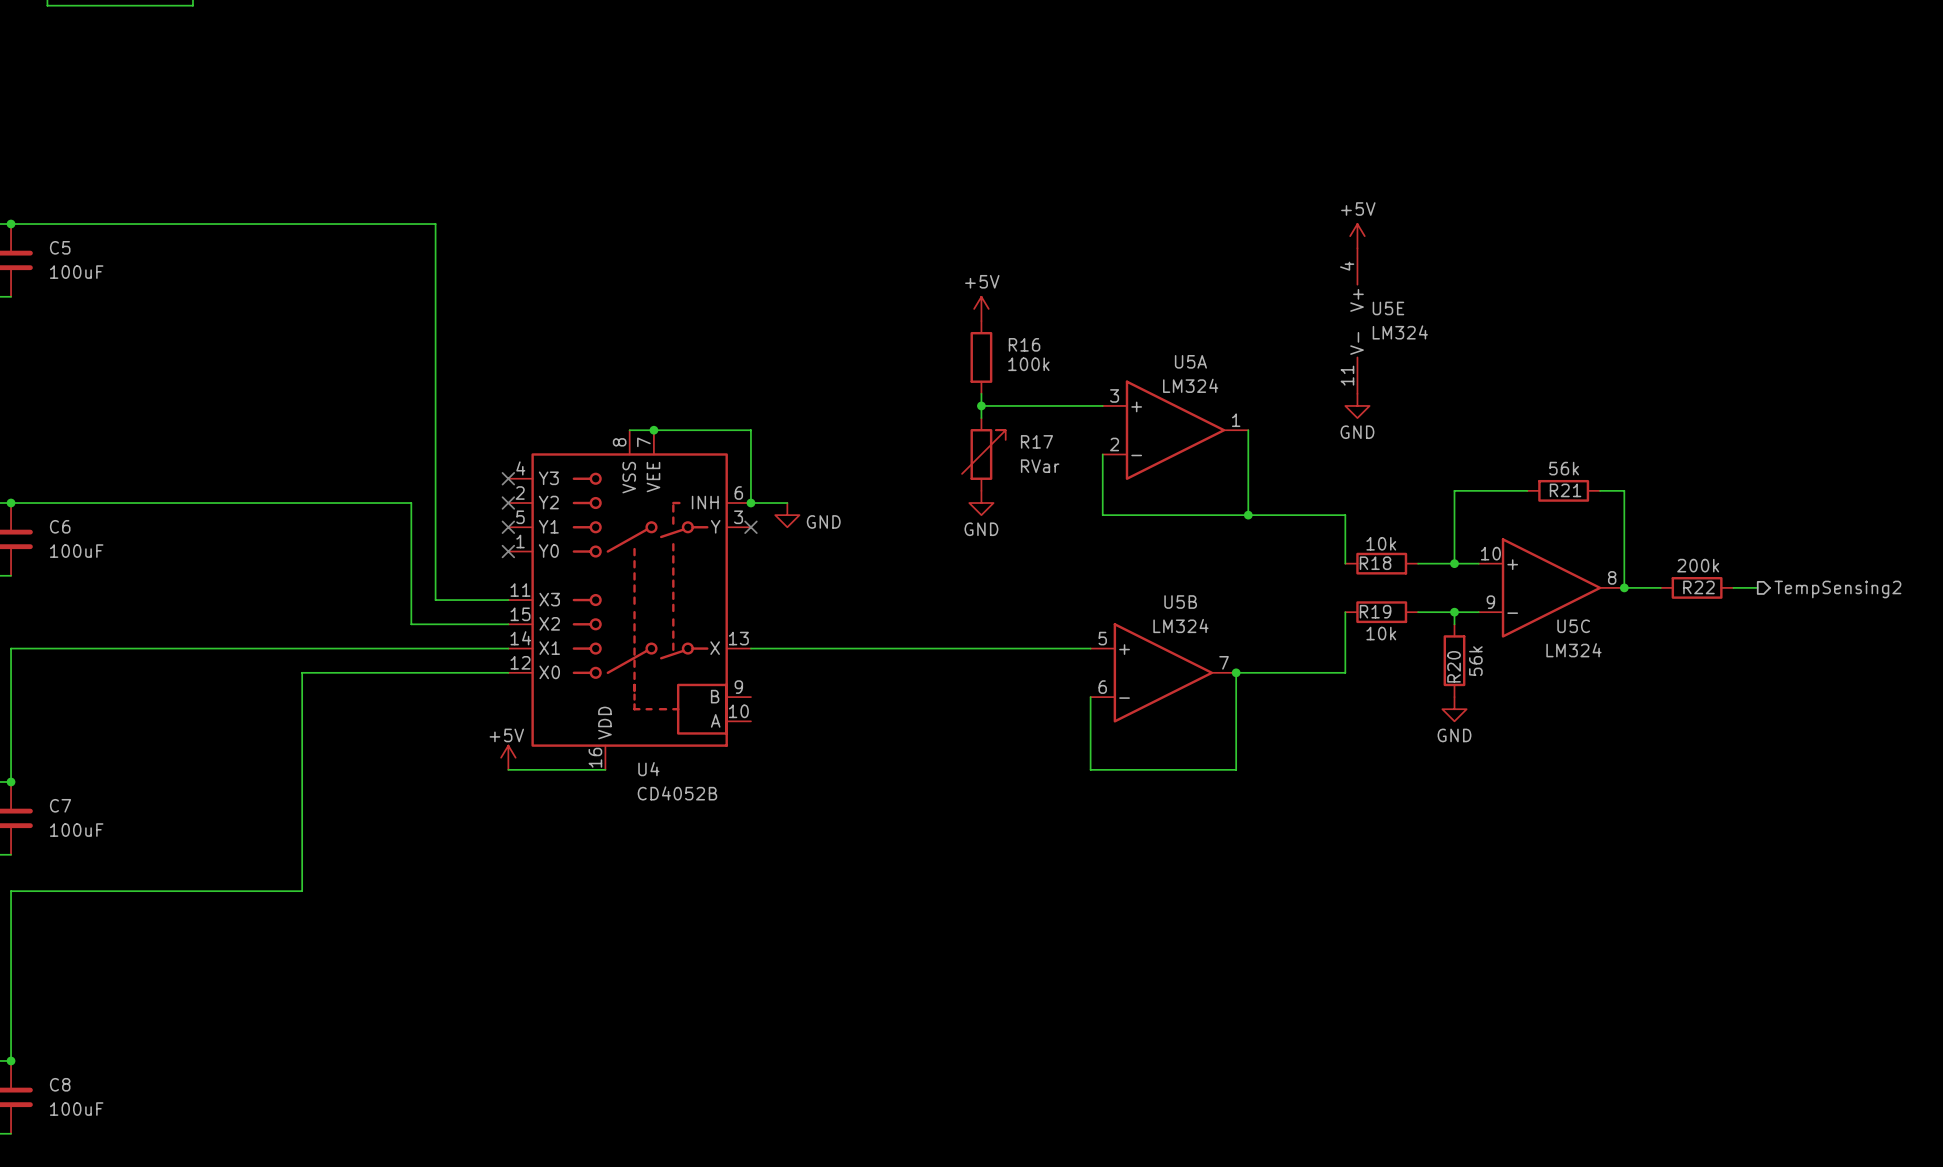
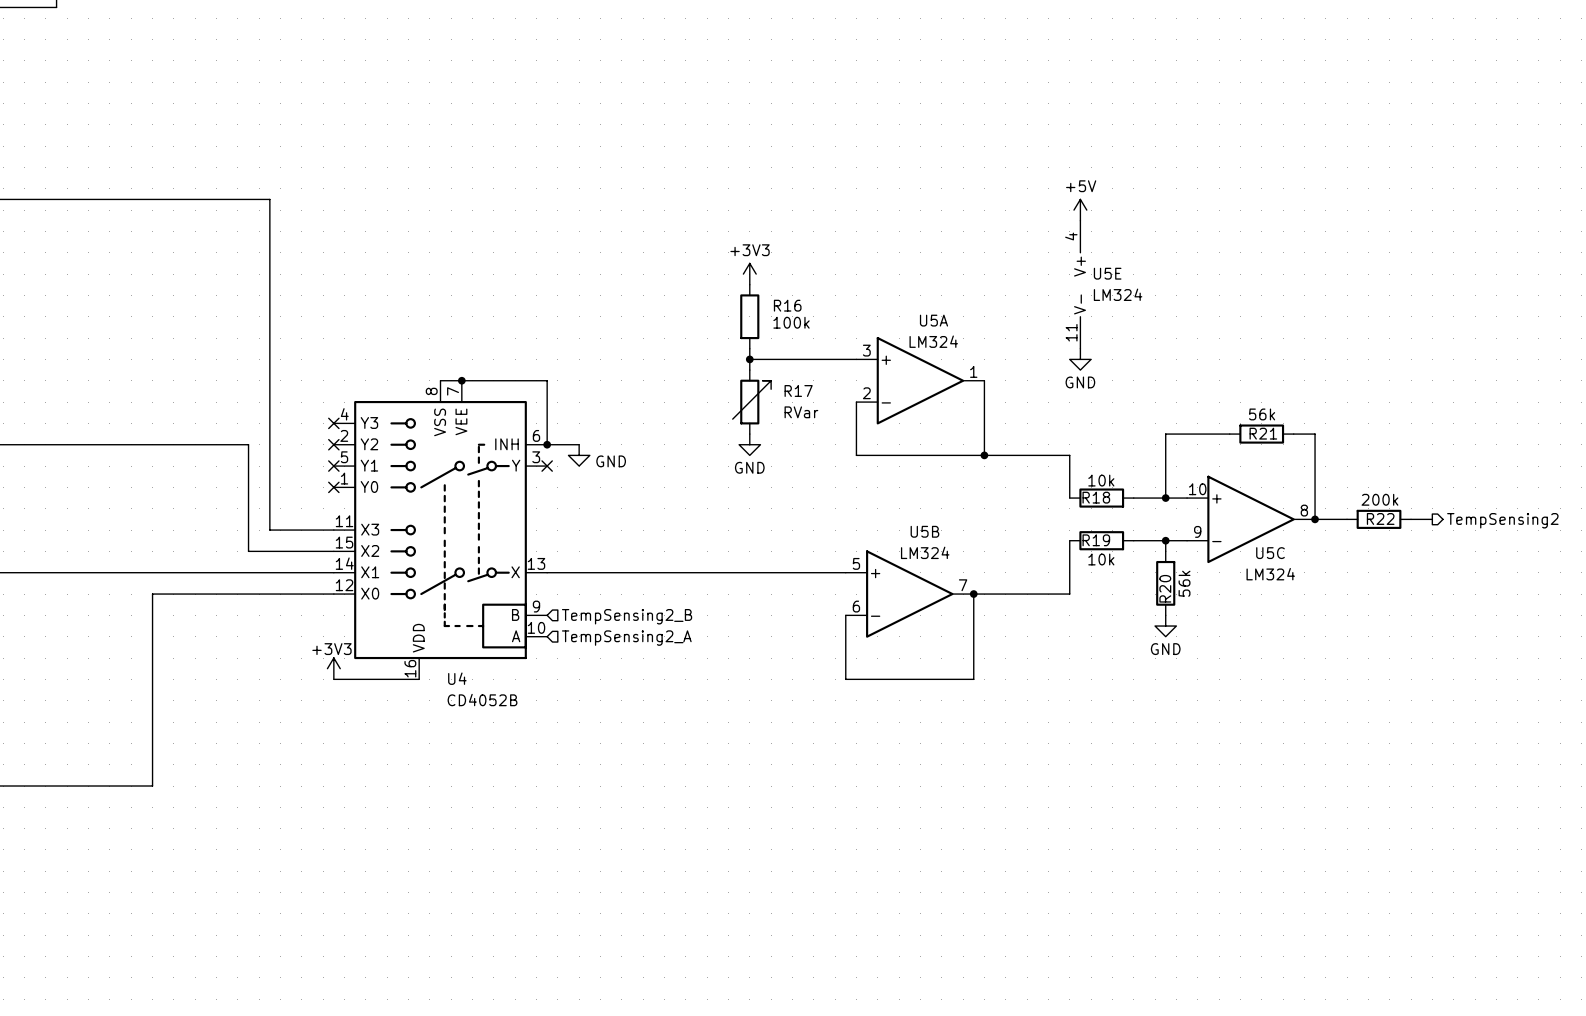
power symbol: +5V (981, 308) -> +3V3 (749, 274)
hierarchical label: none -> TempSensing2_B (627, 616)
hierarchical label: none -> TempSensing2_A (626, 638)
power symbol: +5V (508, 757) -> +3V3 (333, 668)

